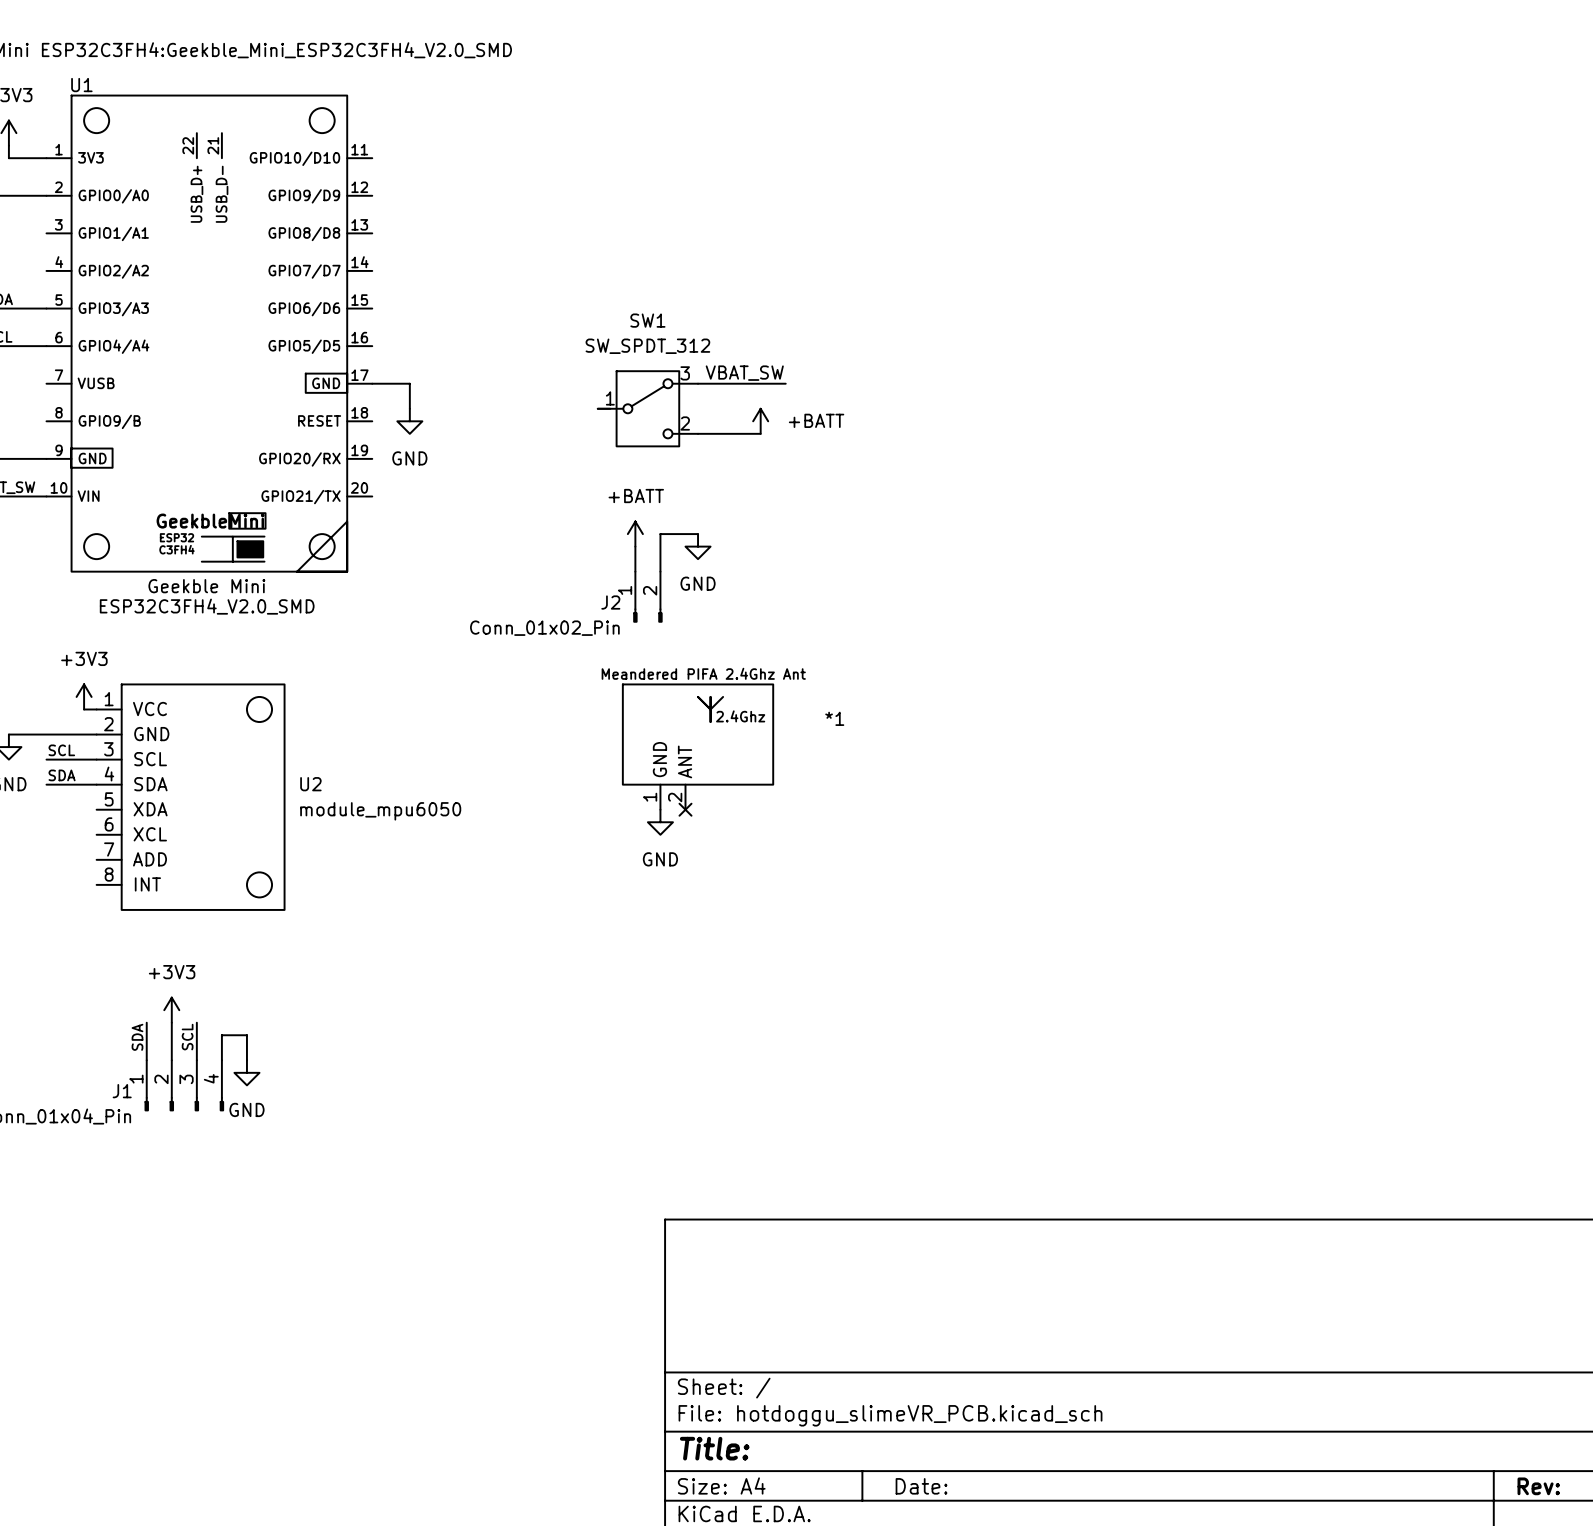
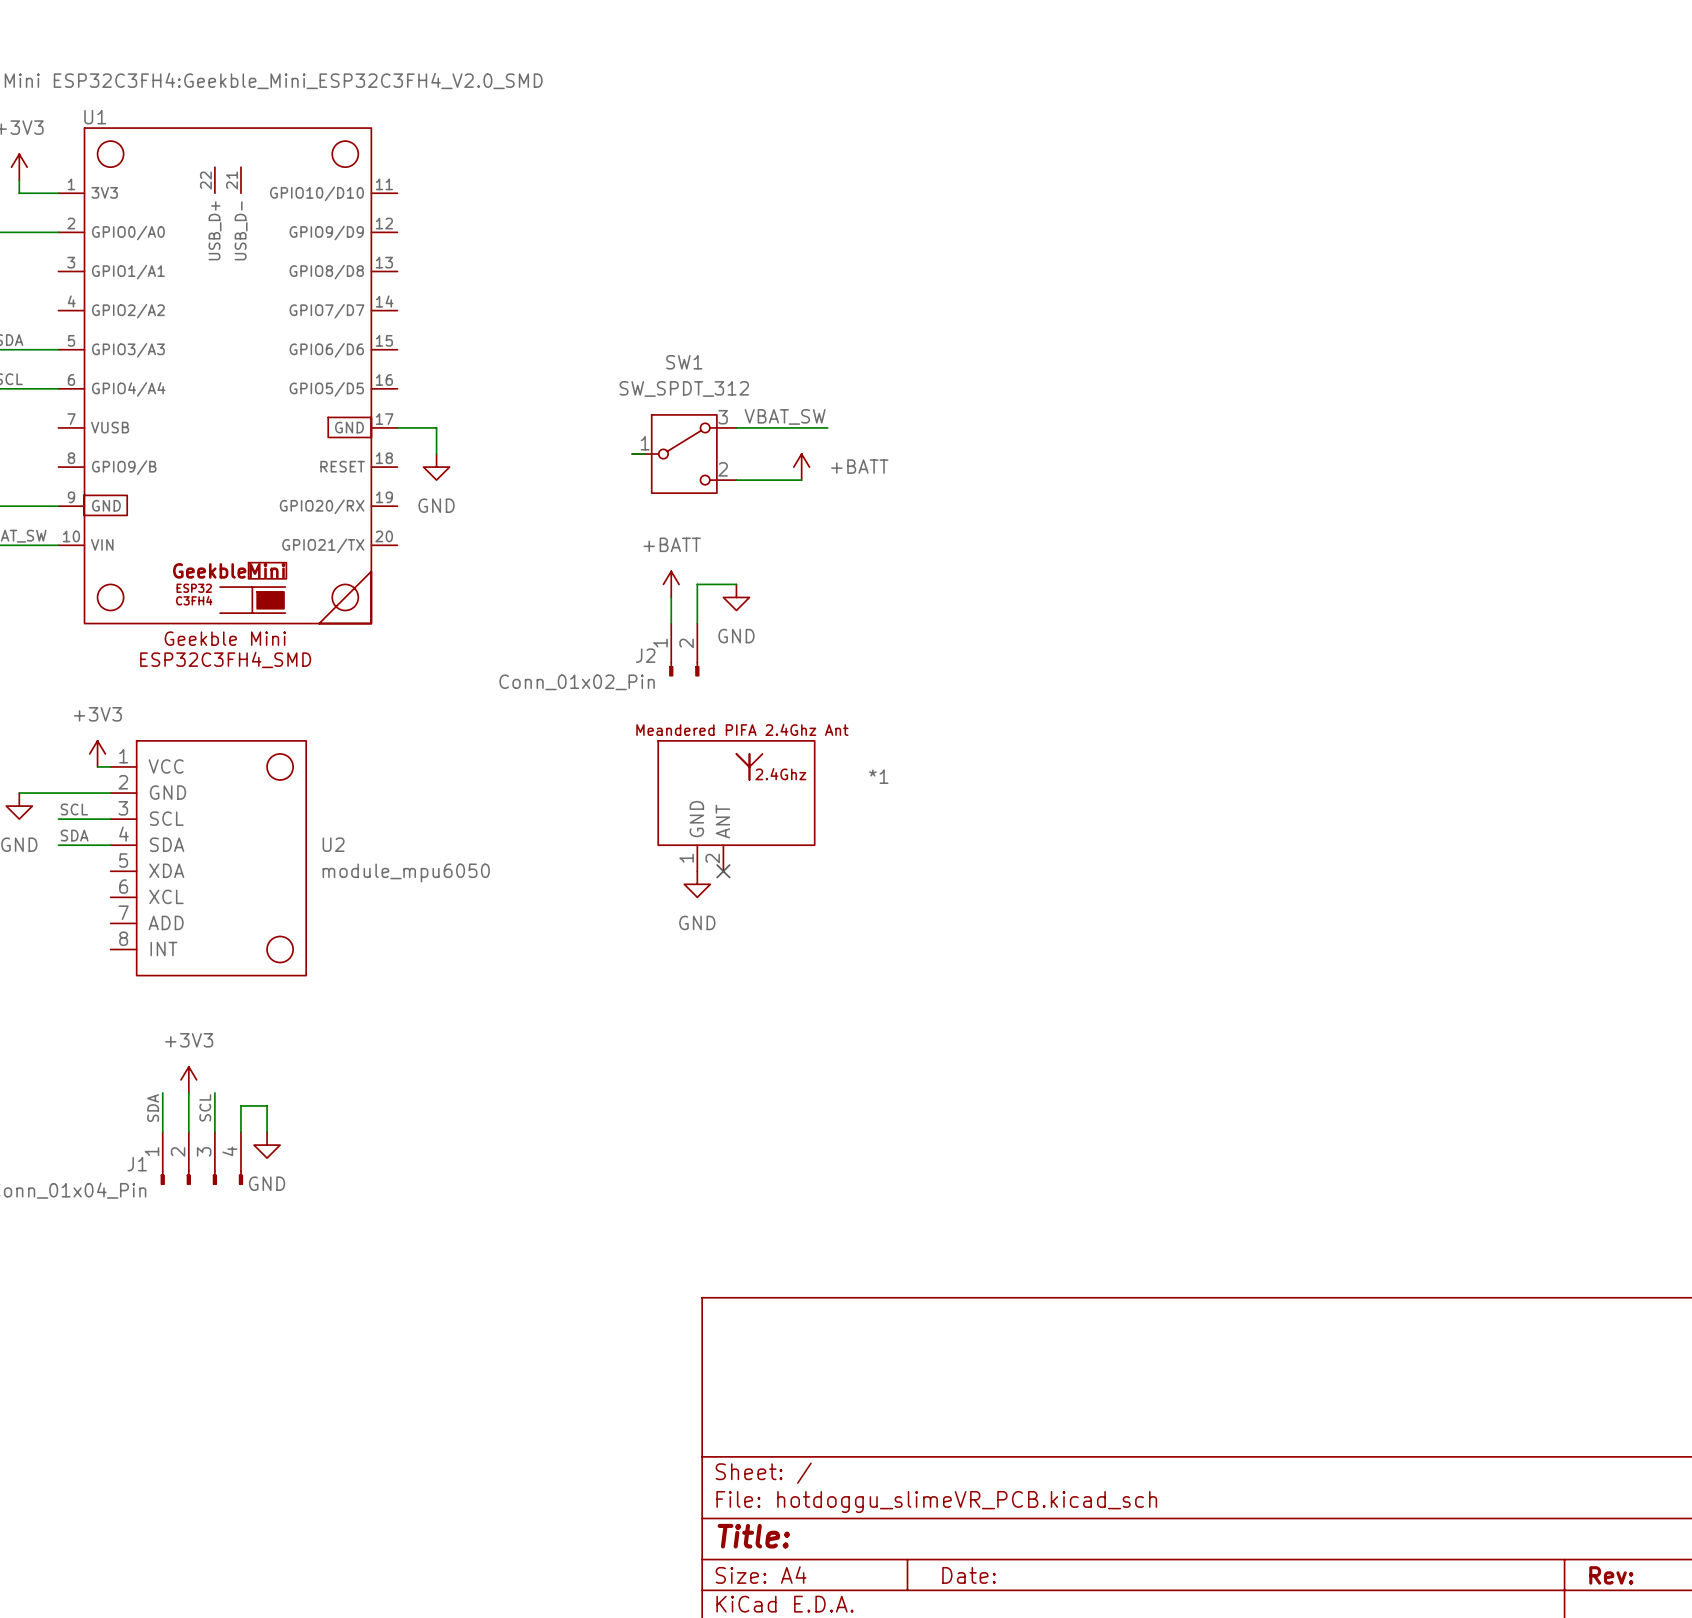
U1 text: ESP32C3FH4_V2.0_SMD (207, 606) -> ESP32C3FH4_SMD (225, 659)

